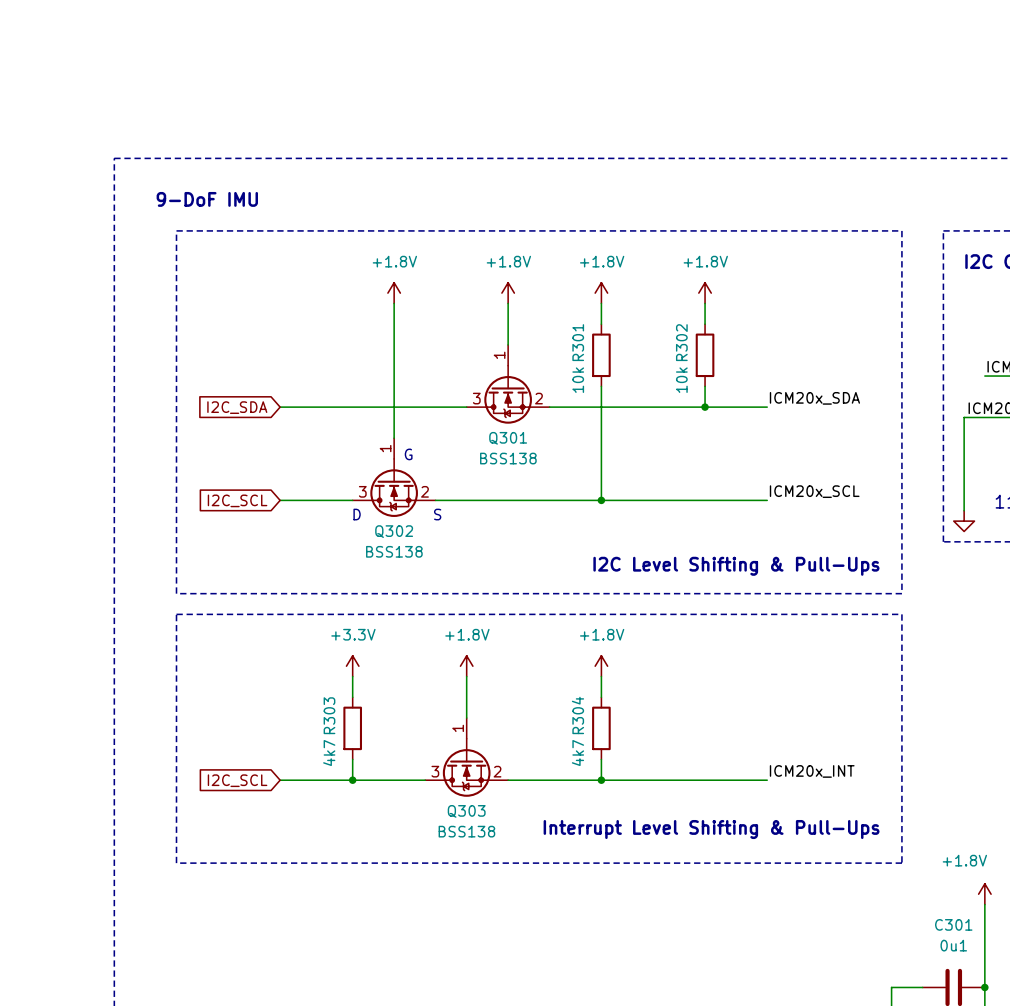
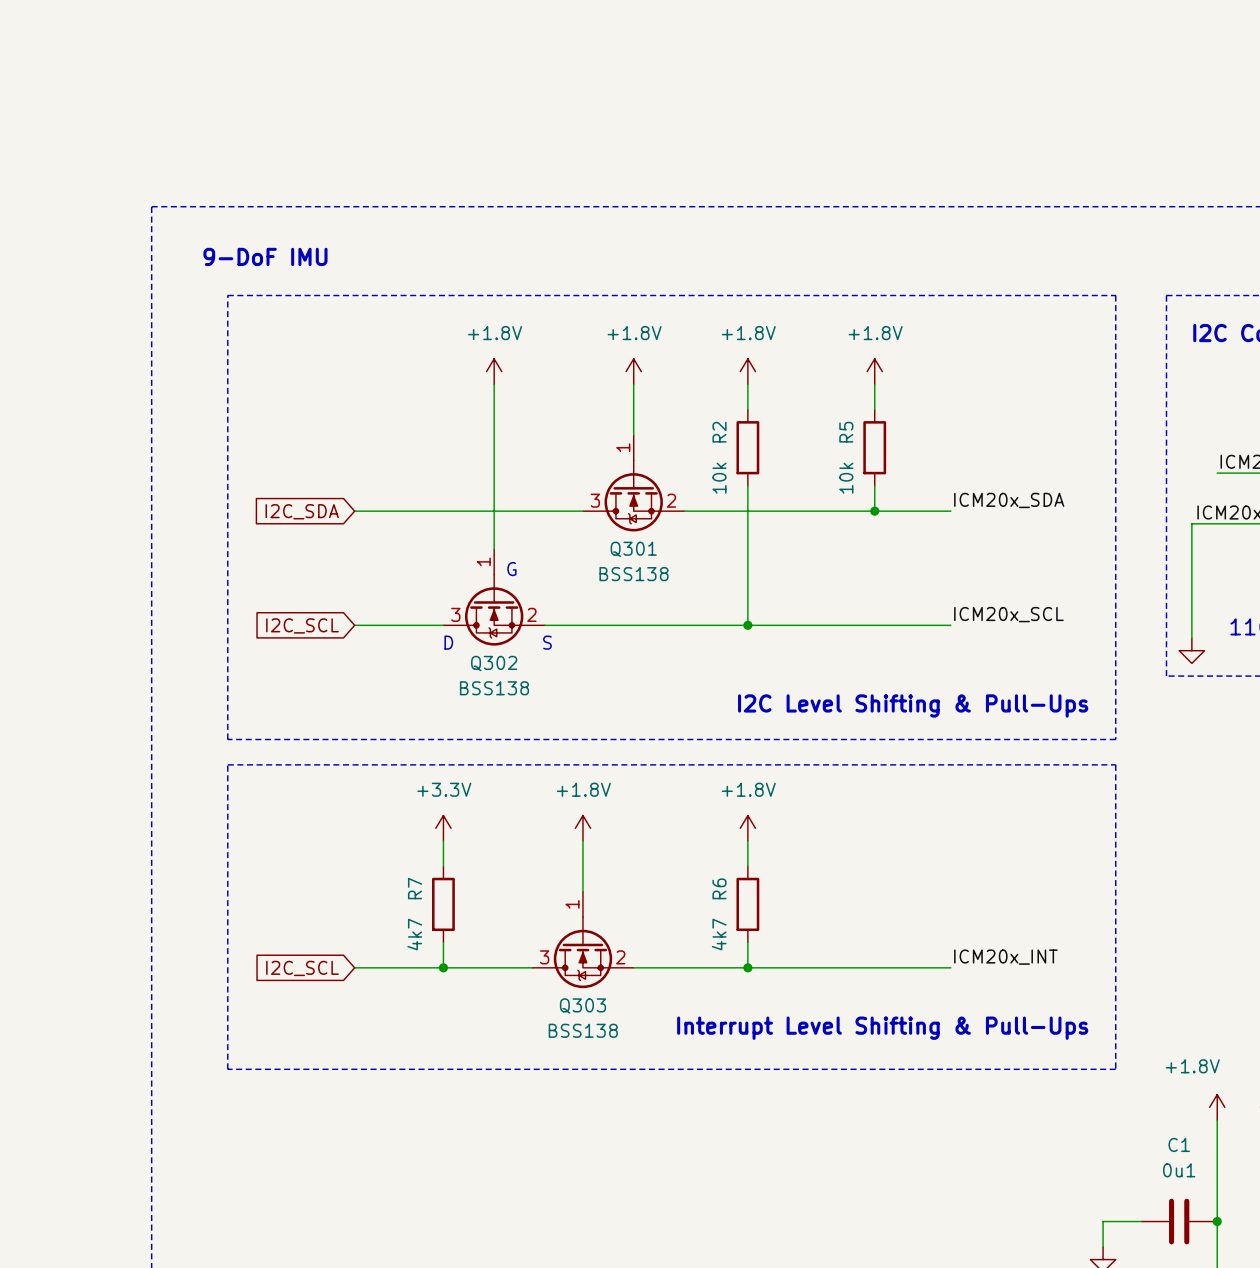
R301 name: R301 (578, 342) -> R2 (719, 432)
R302 name: R302 (681, 342) -> R5 (846, 432)
R303 name: R303 (329, 715) -> R7 (415, 888)
R304 name: R304 (577, 715) -> R6 (719, 888)
C301 name: C301 (953, 924) -> C1 (1179, 1144)

